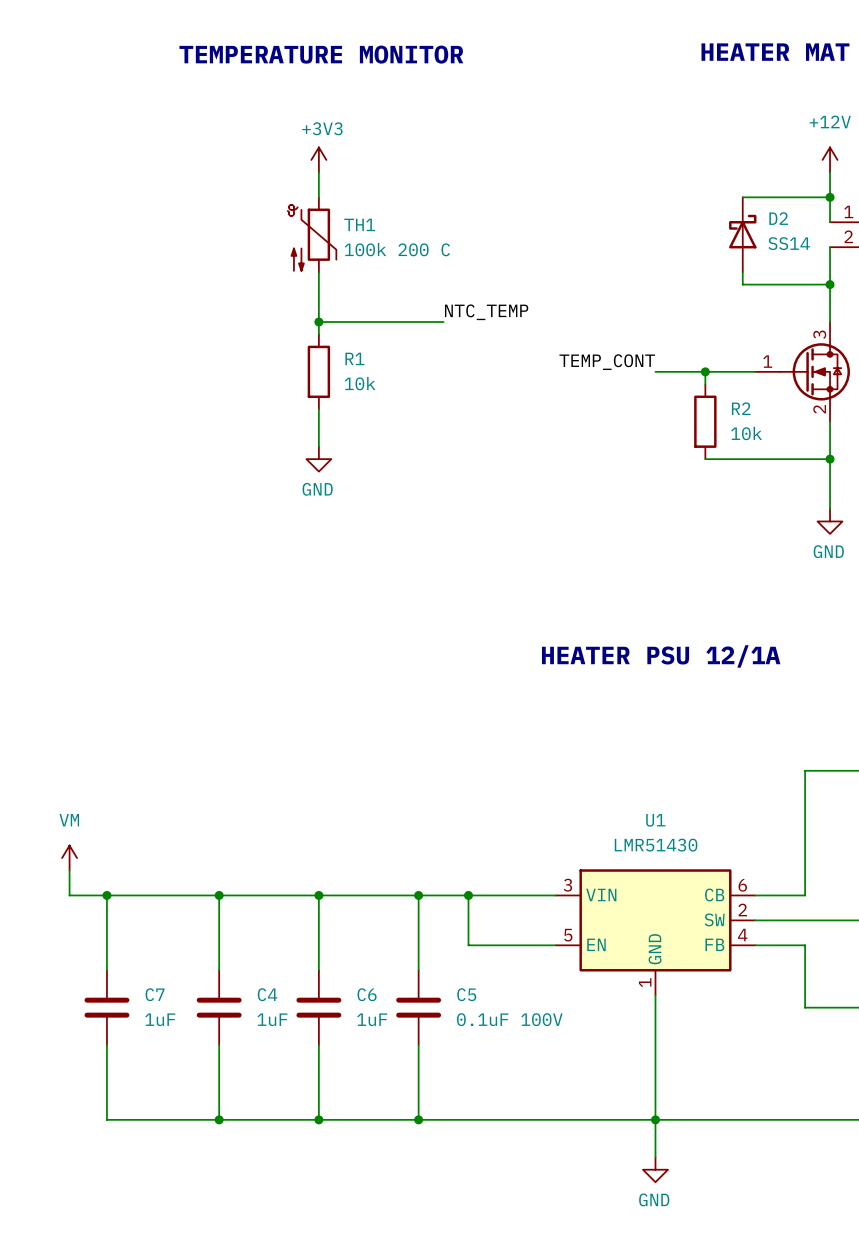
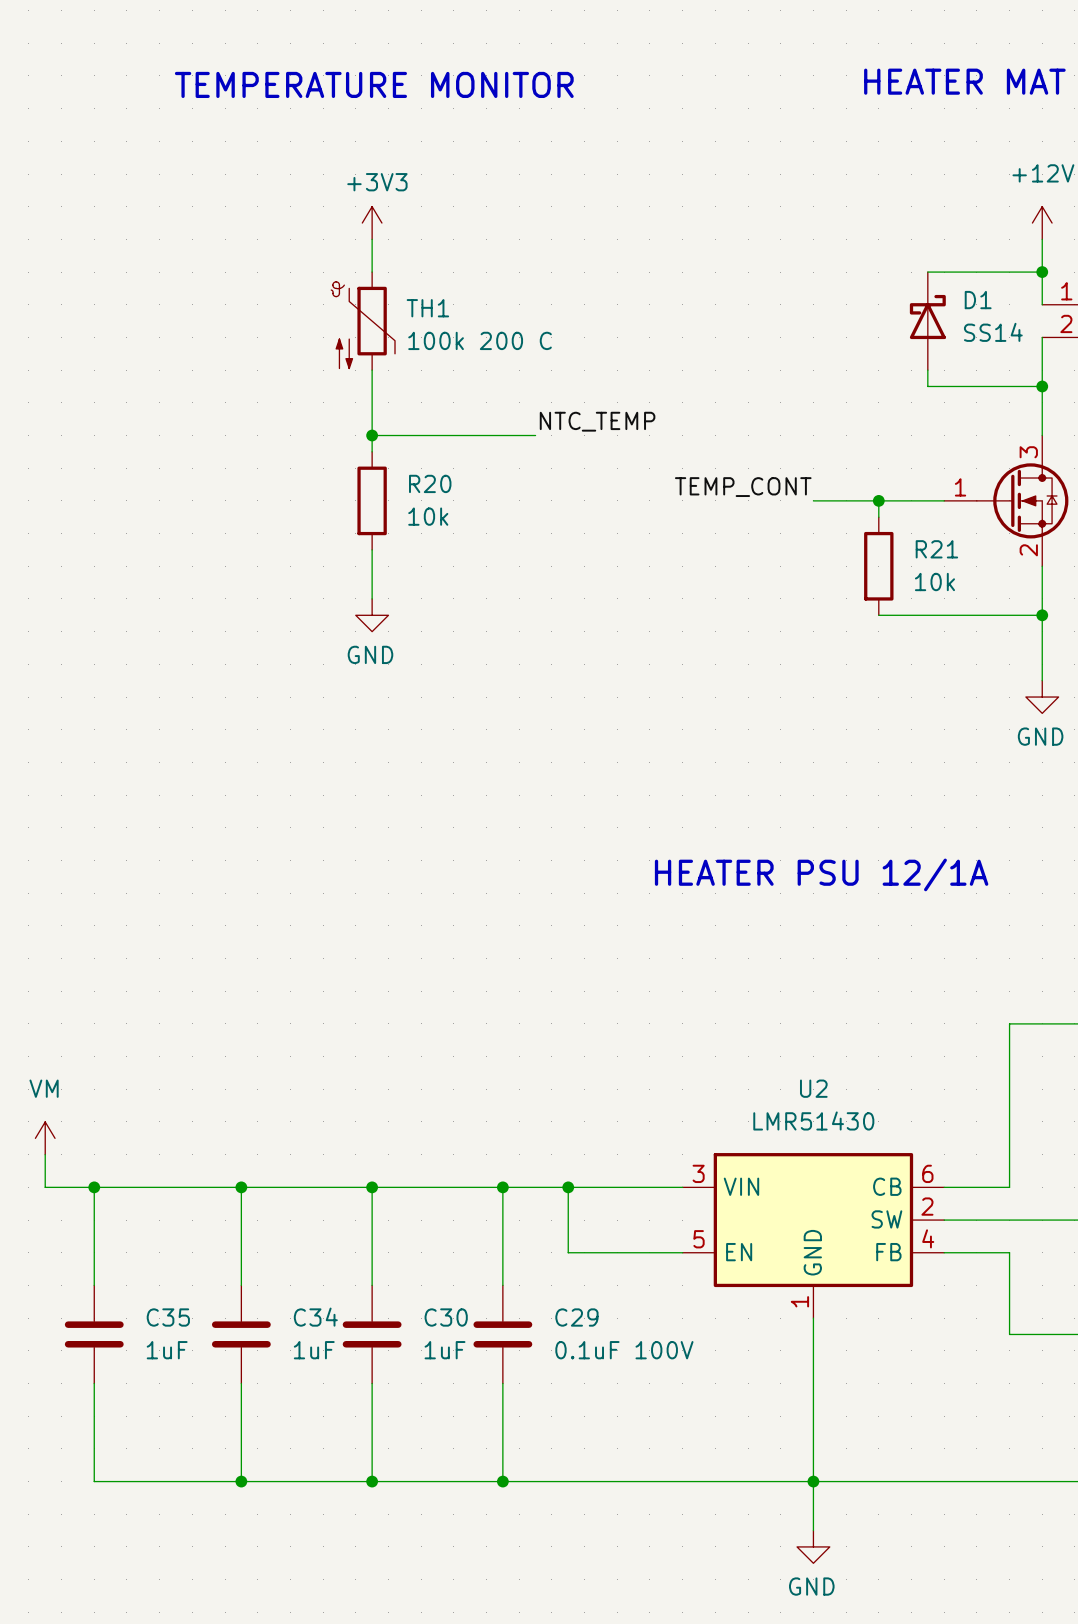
D2 name: D2 (778, 218) -> D1 (978, 300)
R1 name: R1 (354, 358) -> R20 (430, 483)
R2 name: R2 (741, 408) -> R21 (936, 549)
U1 name: U1 (655, 820) -> U2 (813, 1088)
C7 name: C7 (155, 994) -> C35 (168, 1317)
C4 name: C4 (267, 994) -> C34 (315, 1317)
C6 name: C6 (367, 994) -> C30 (446, 1317)
C5 name: C5 (466, 994) -> C29 (576, 1317)

